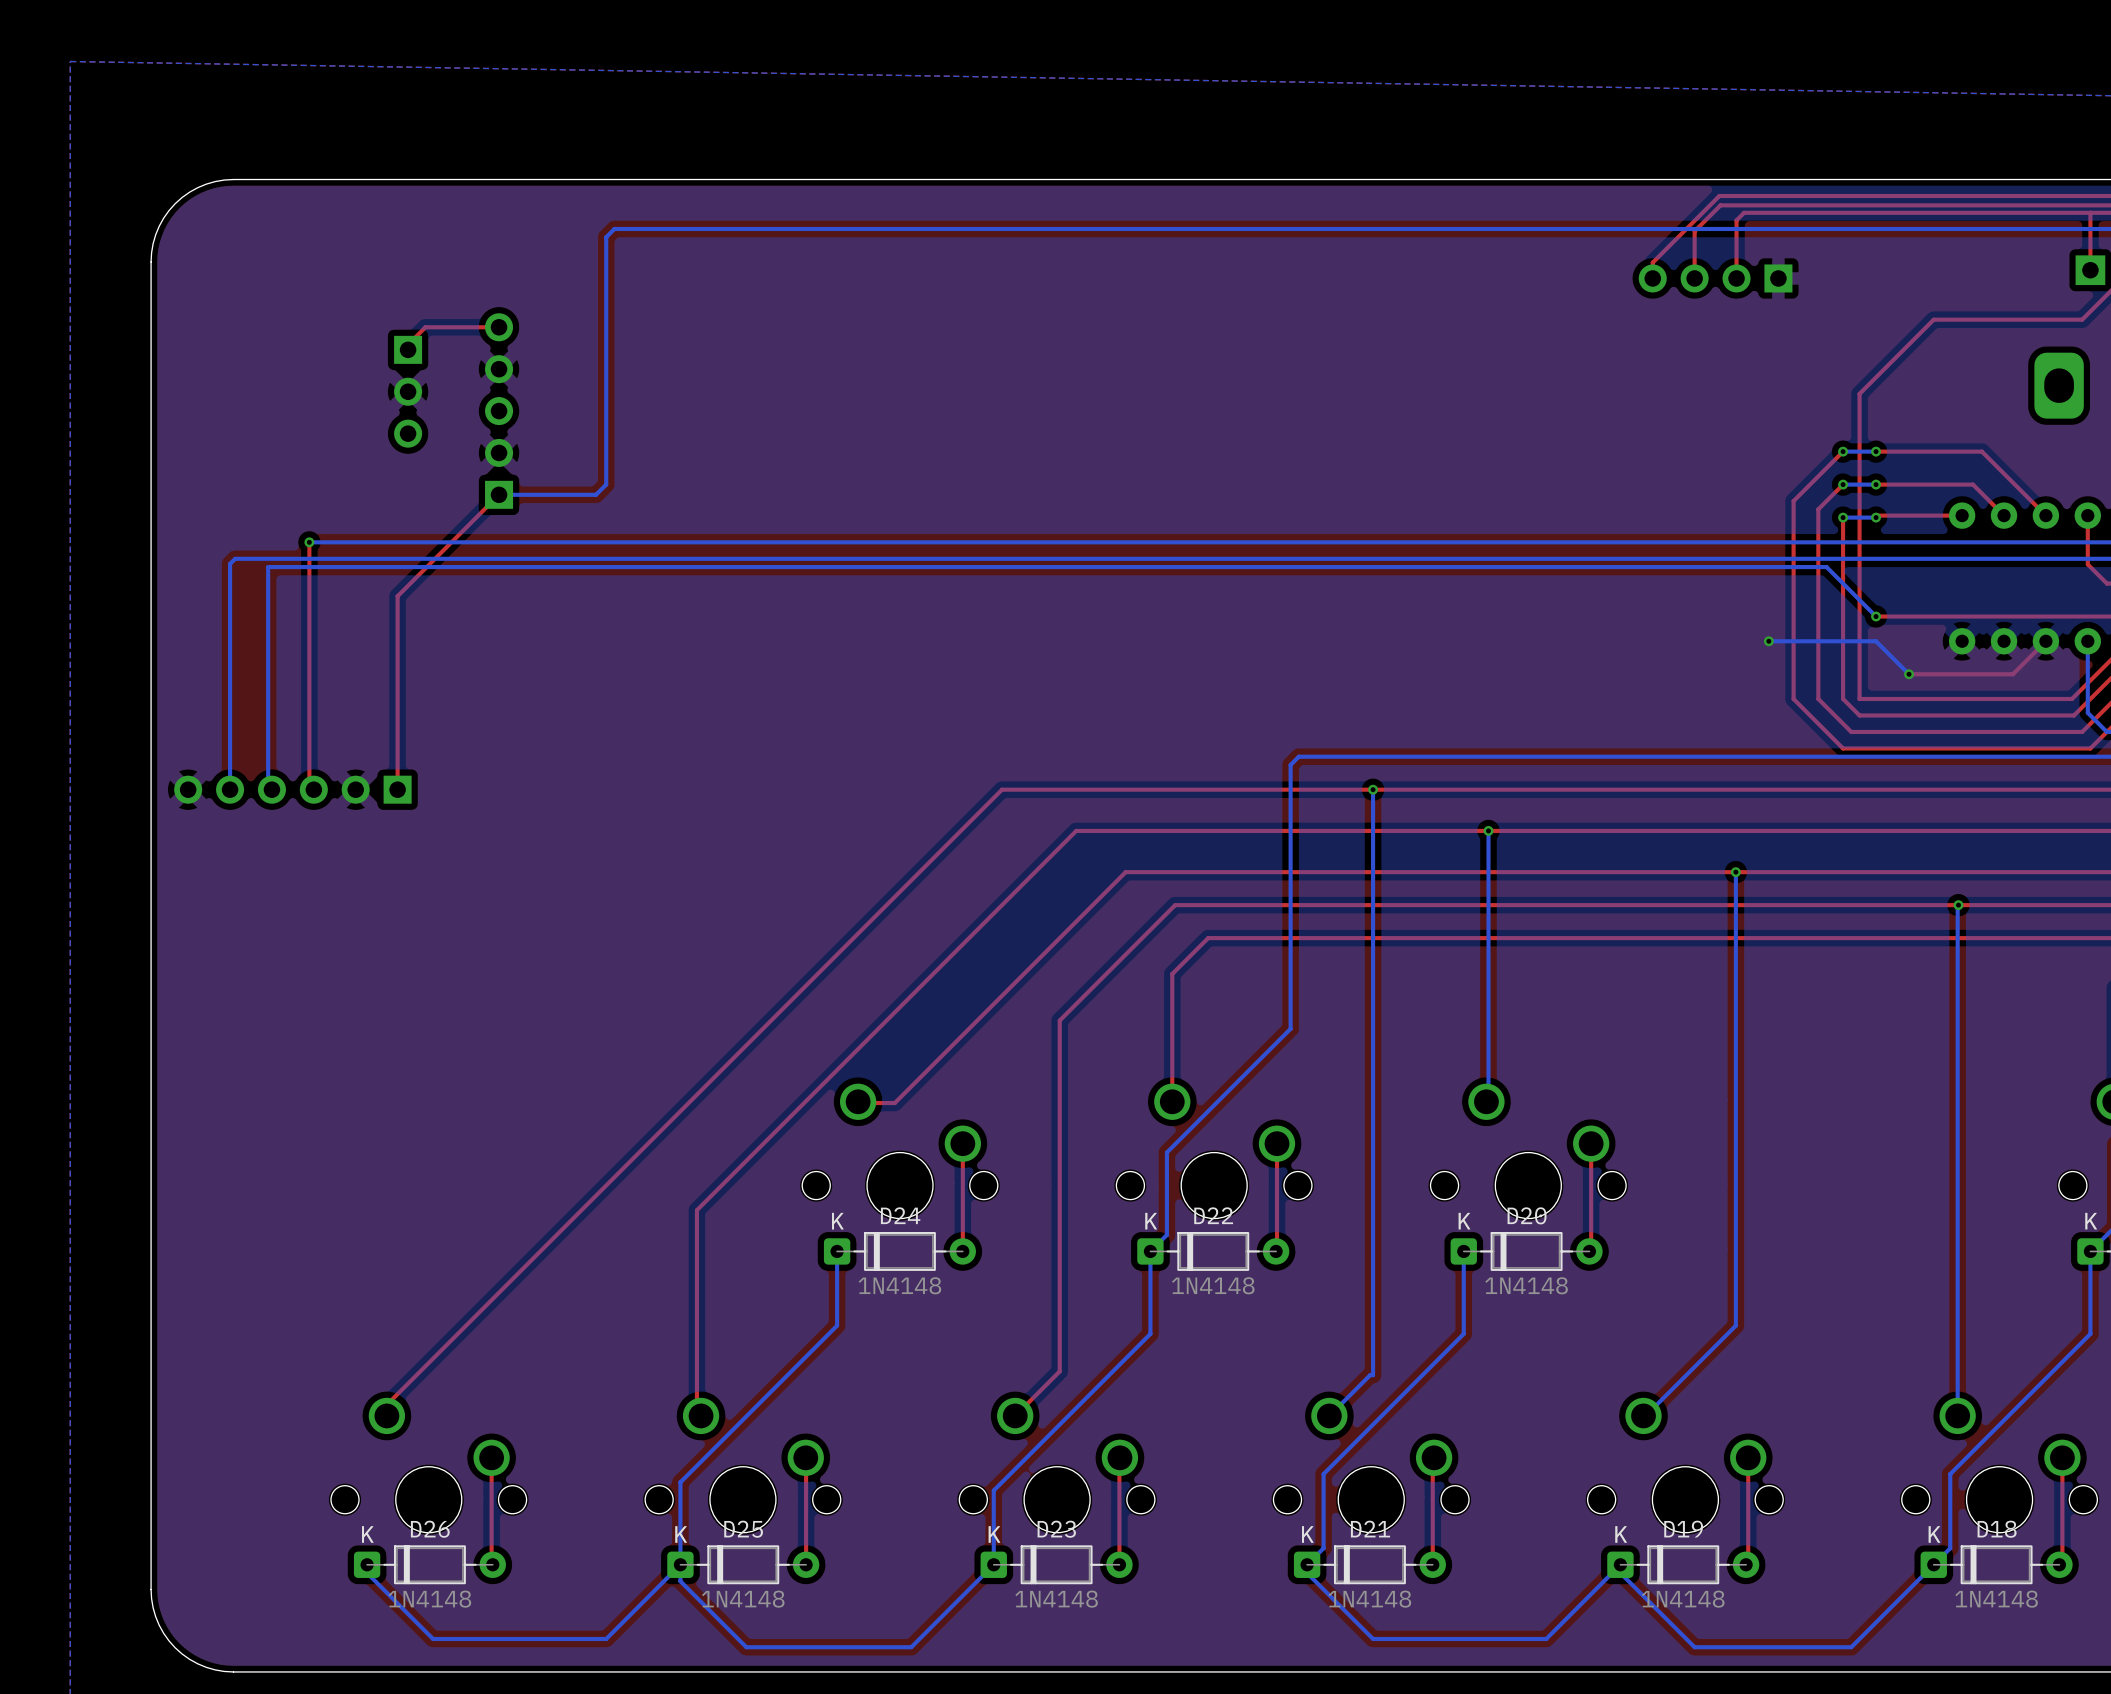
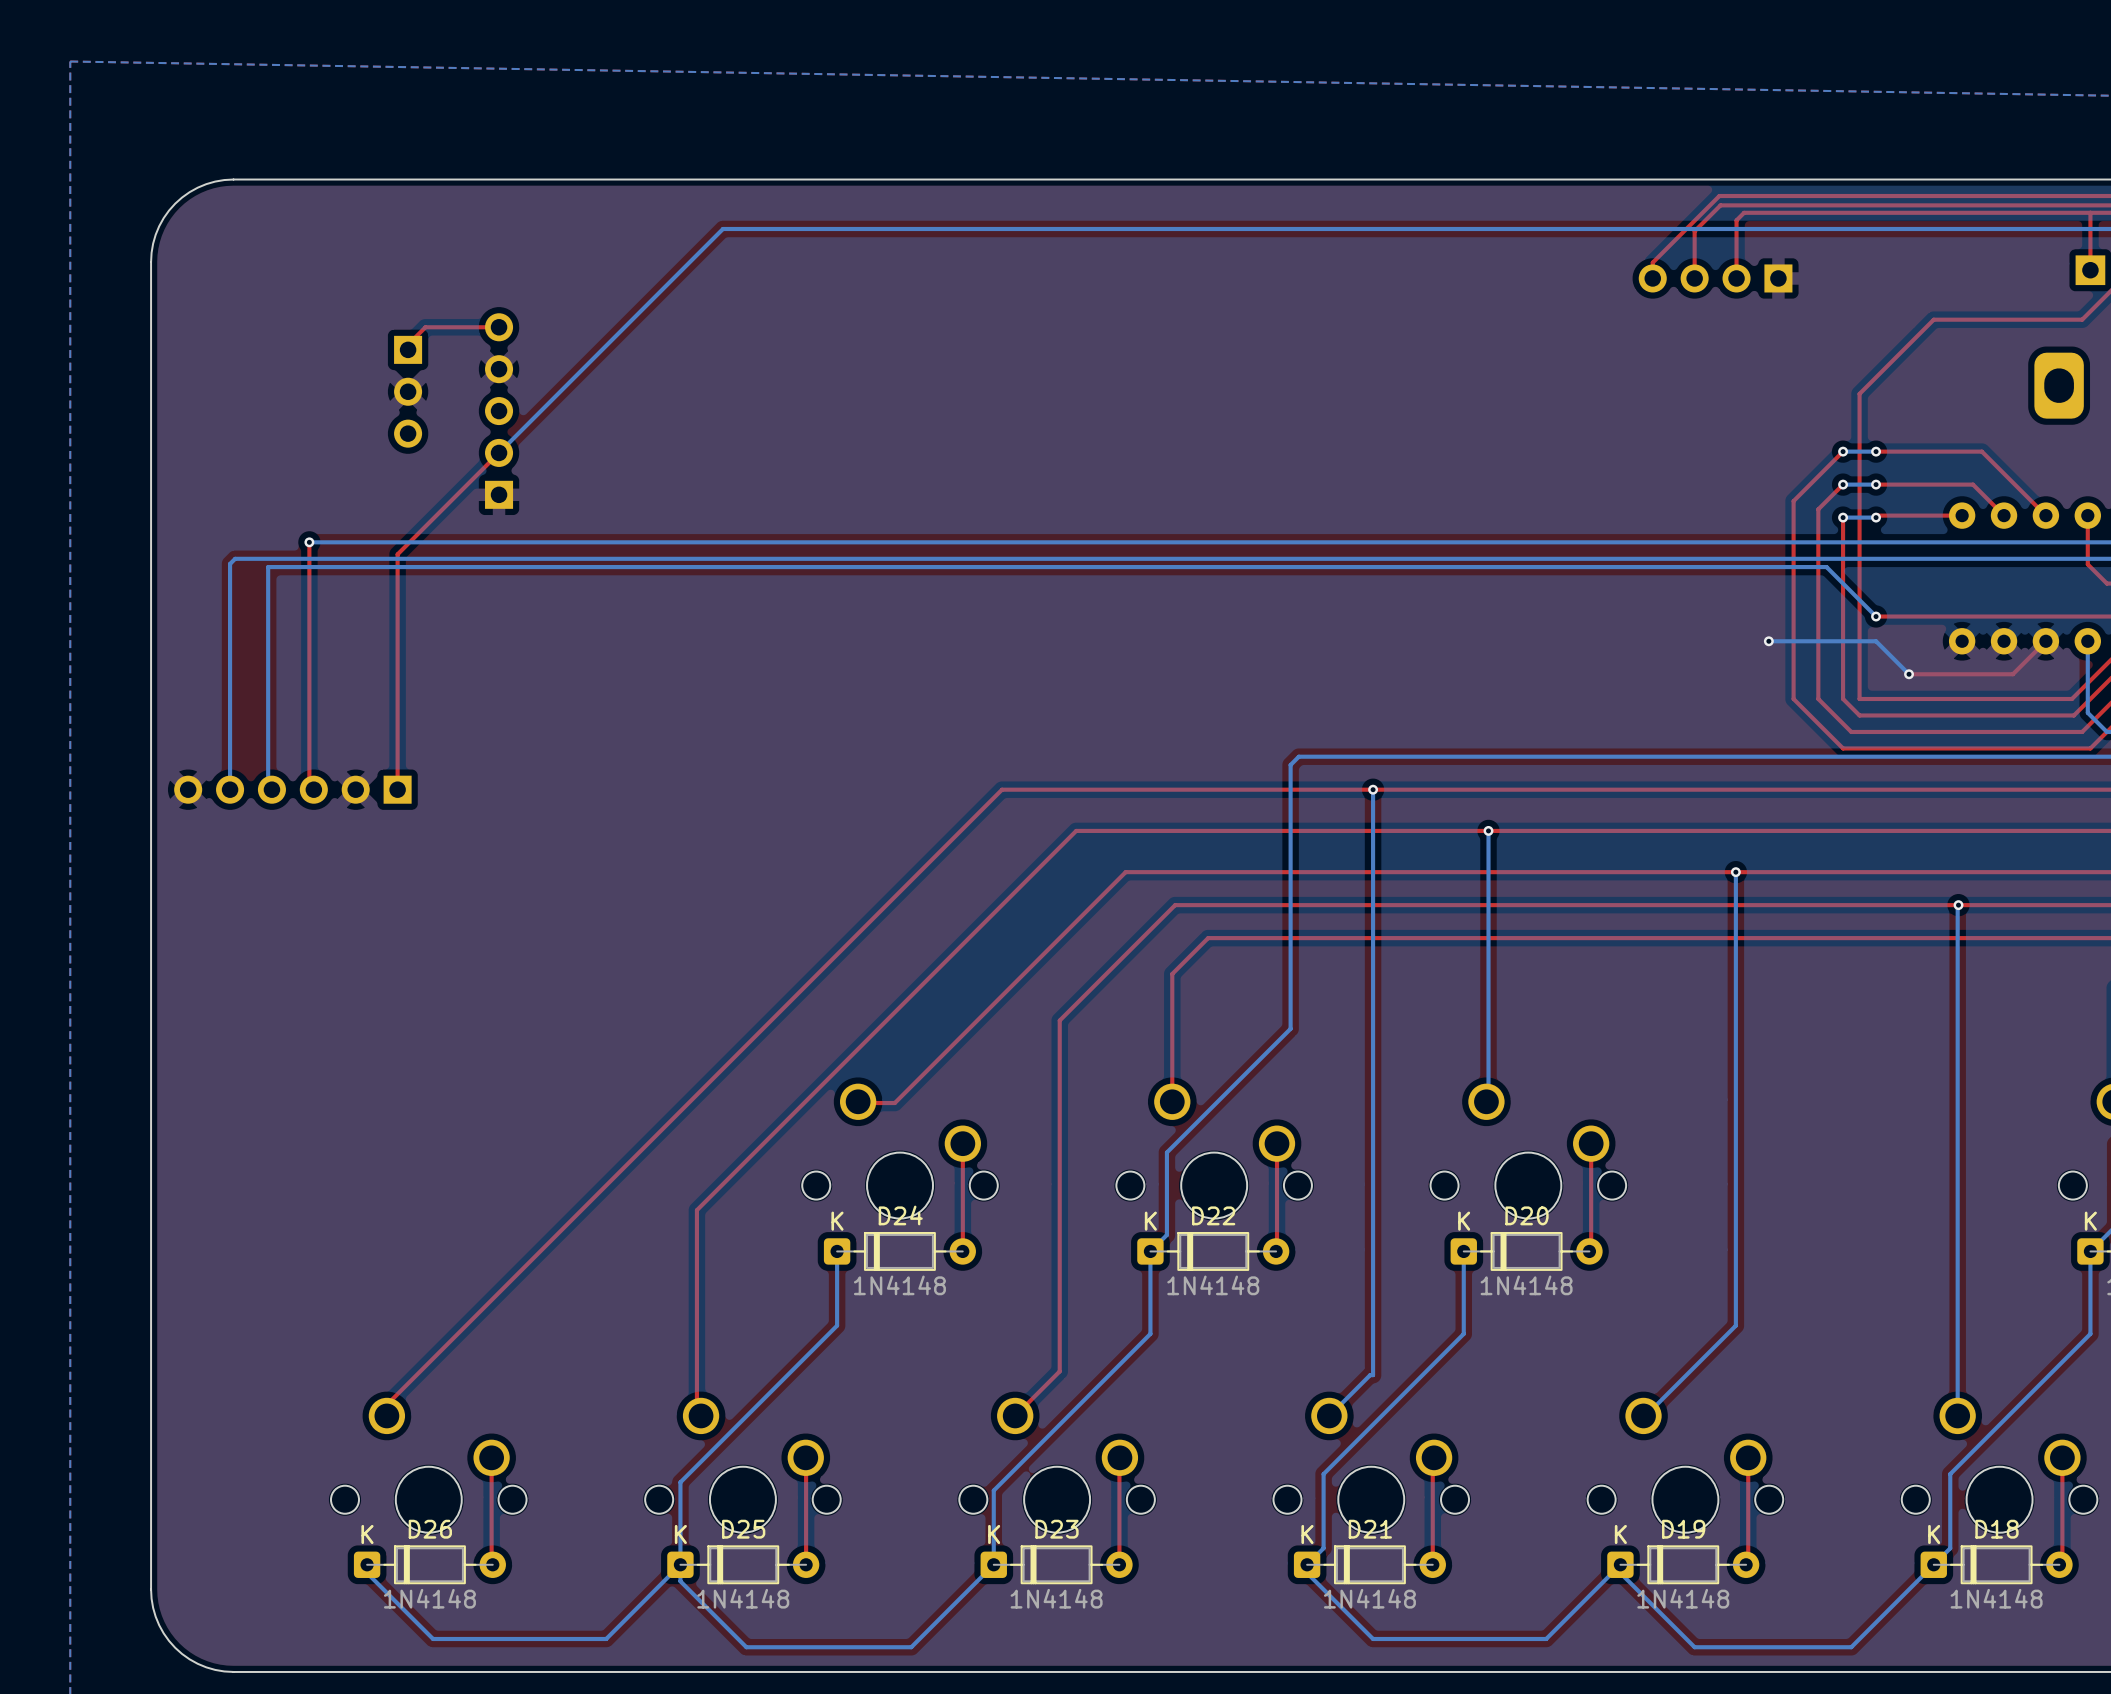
bottom track: (722, 228) (614, 228) (606, 237) (606, 484) (596, 494) (499, 494) -> (722, 228) (499, 452)
top track: (499, 494) (397, 596) -> (499, 452) (397, 554) (397, 596)

